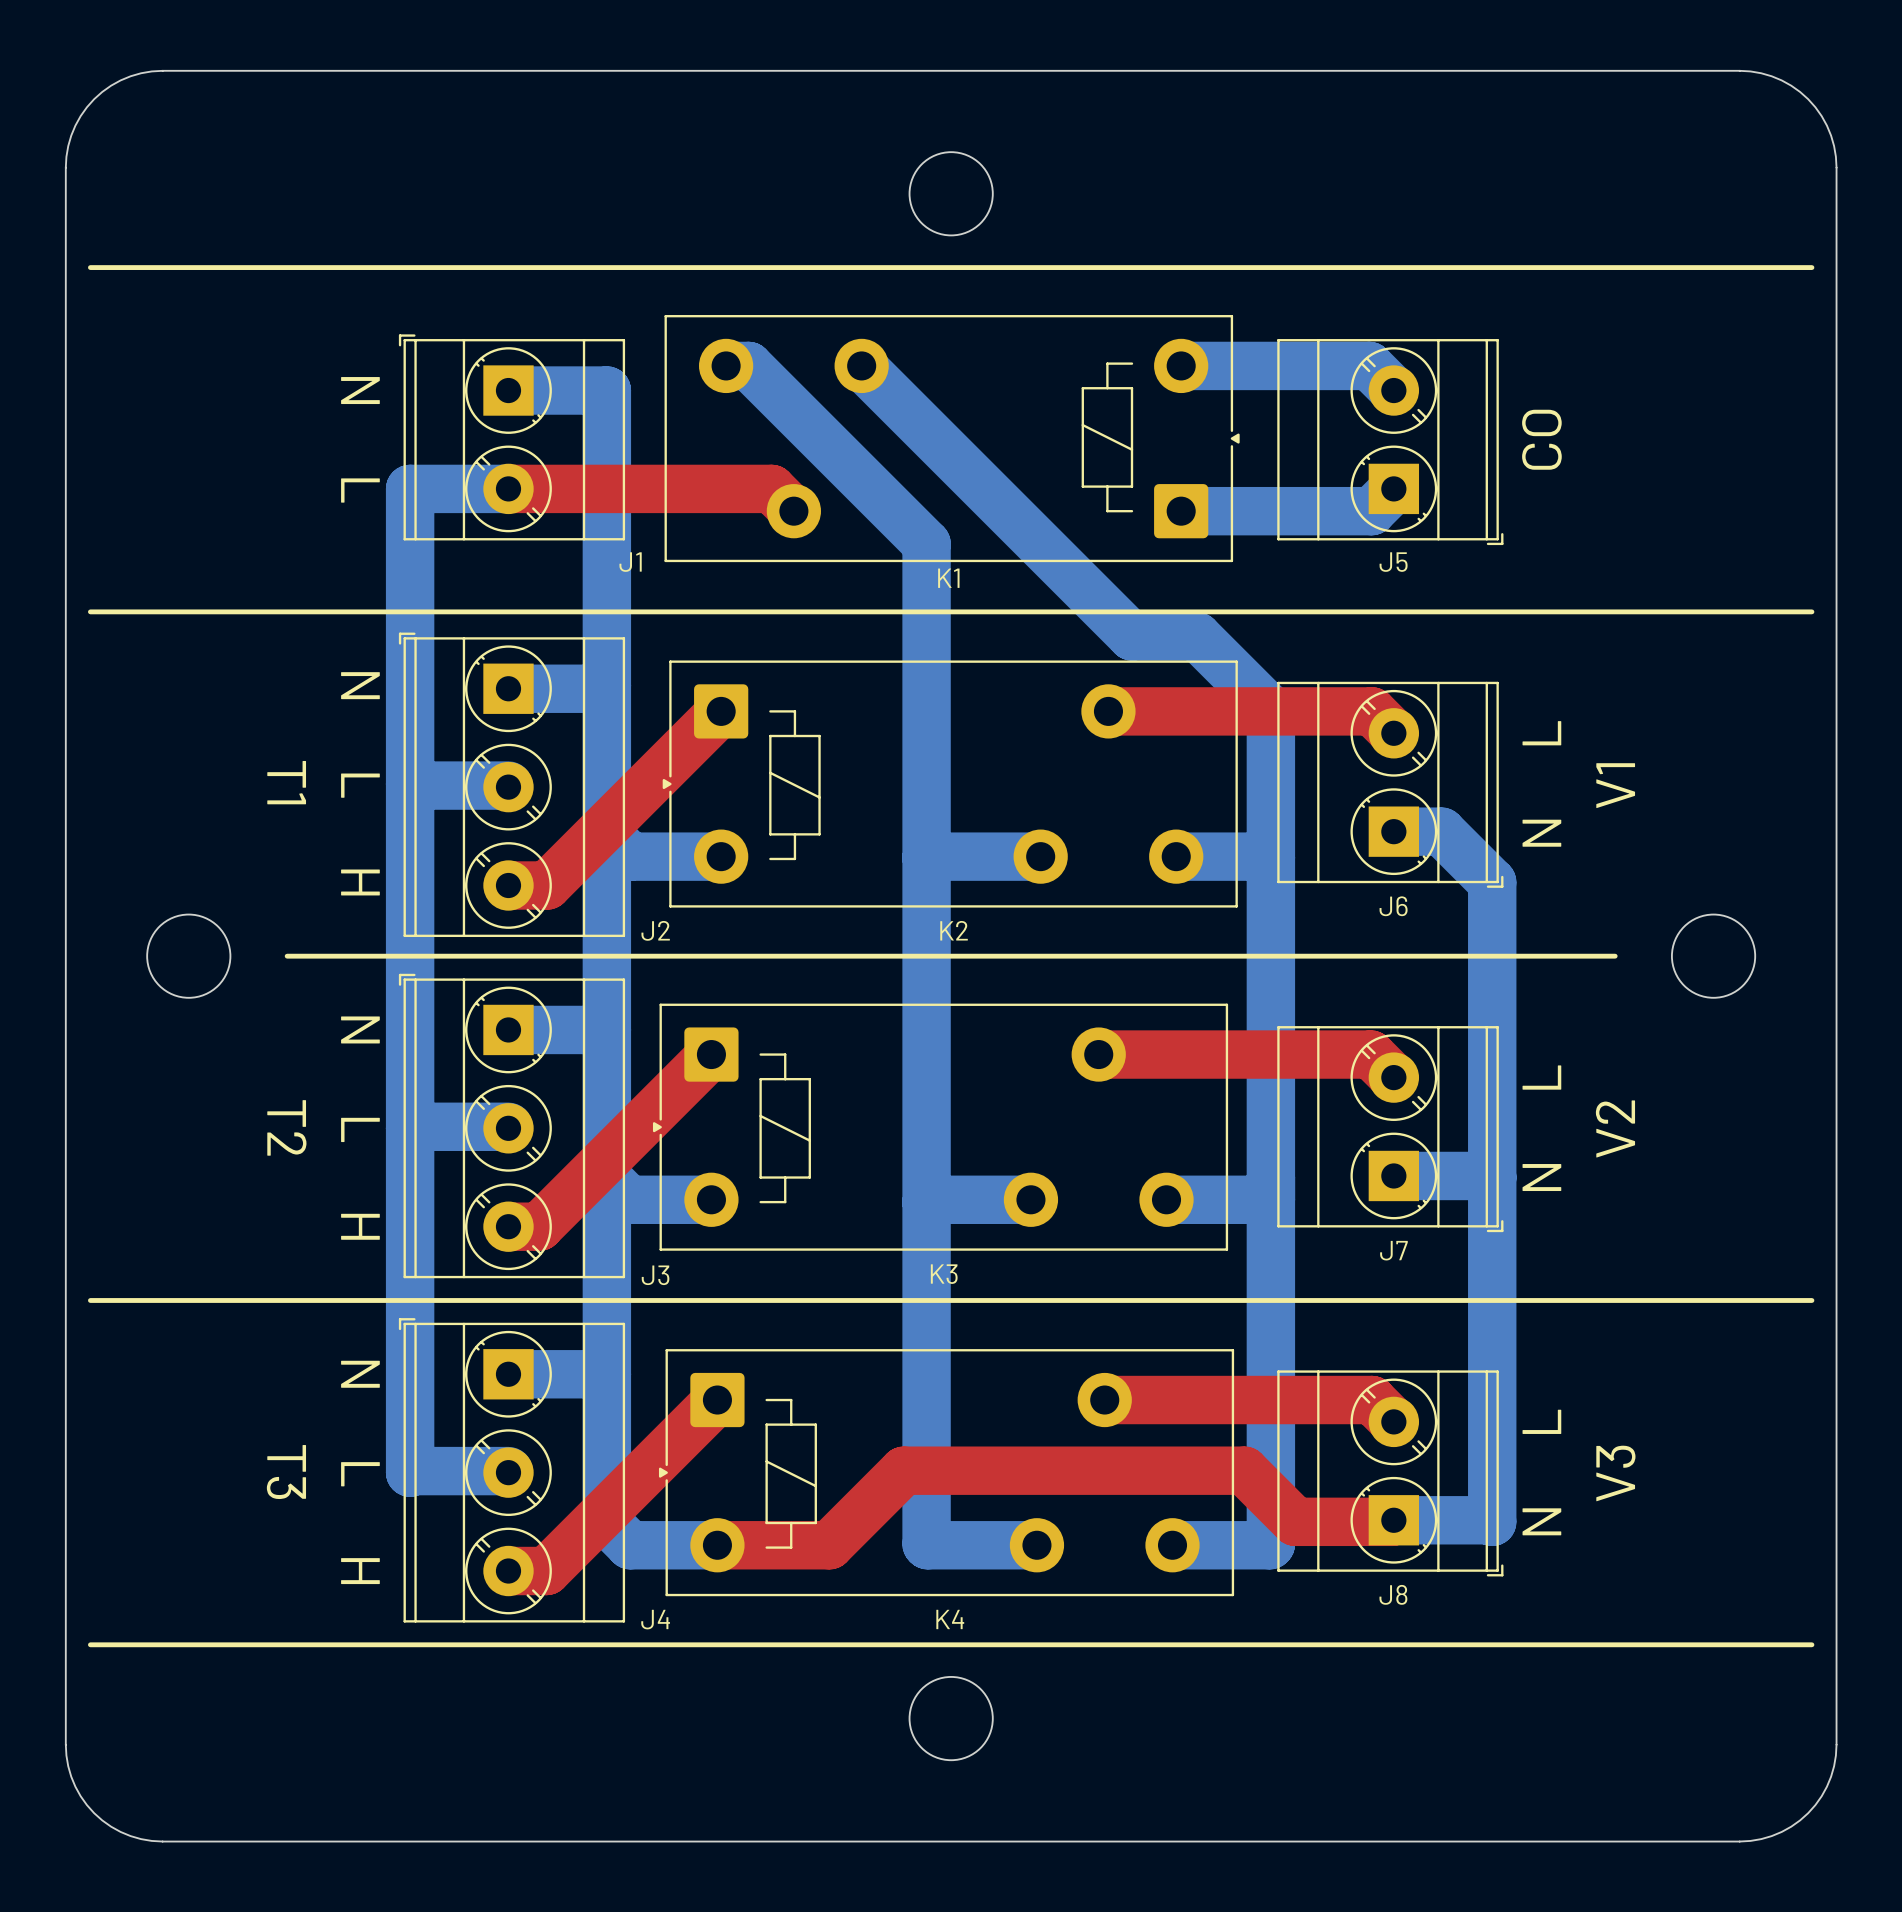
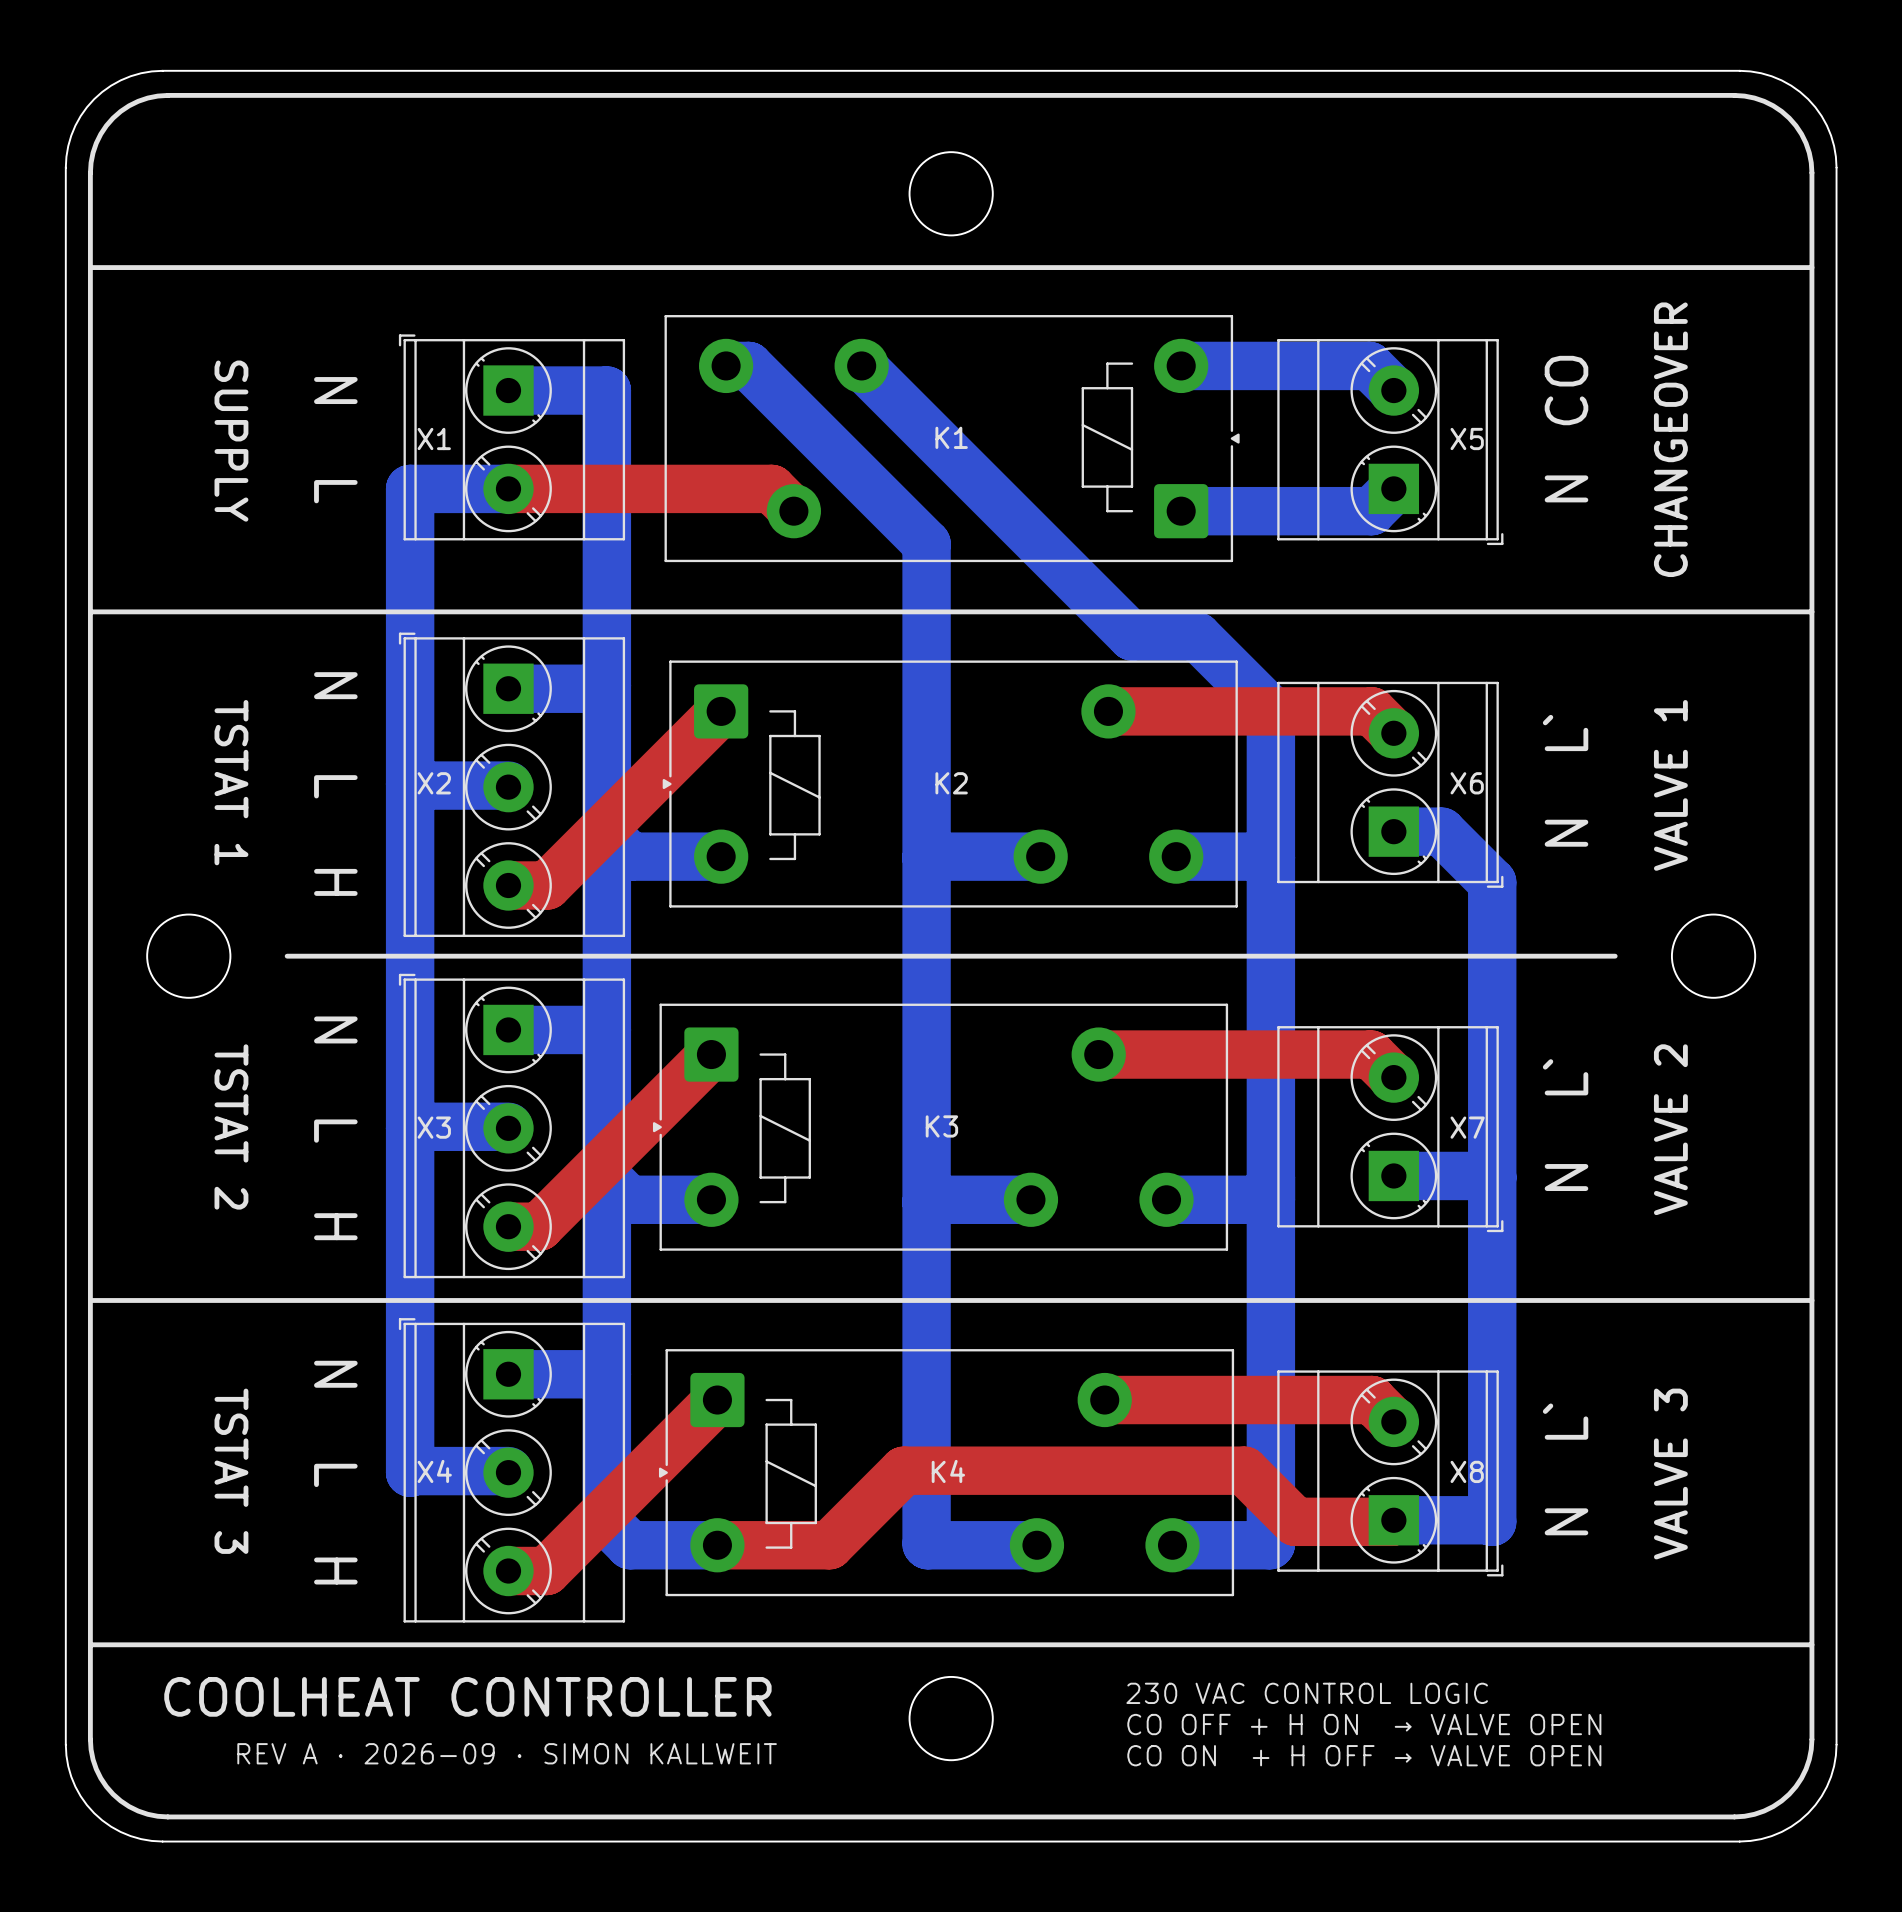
line: none -> (167, 95) (1734, 95) (1764, 101) (1789, 118) (1806, 143) (1811, 172) (1811, 1739) (1806, 1769) (1789, 1794) (1764, 1811) (1734, 1816) (167, 1816) (138, 1811) (113, 1794) (96, 1769) (90, 1739) (90, 172) (96, 143) (113, 118) (138, 101) (167, 95)
text position: N (360, 390) -> N (335, 390)
text position: CO (1541, 439) -> CO (1566, 390)
text: none -> CHANGEOVER (1670, 439)
text: none -> SUPPLY (231, 441)
text: none -> N (1566, 488)
text position: L (360, 490) -> L (335, 491)
J1 name: J1 (630, 562) -> X1 (434, 438)
J5 name: J5 (1393, 562) -> X5 (1467, 438)
K1 name position: K1 (948, 578) -> K1 (951, 437)
text position: N (360, 685) -> N (335, 685)
text: L (1541, 733) -> L` (1565, 732)
text: none -> TSTAT 1 (231, 782)
text: T1 (286, 782) -> none
text position: L (360, 785) -> L (335, 786)
text: V1 (1615, 785) -> none
text: none -> VALVE 1 (1670, 785)
text position: N (1541, 833) -> N (1566, 833)
text position: H (360, 882) -> H (335, 882)
J6 name: J6 (1393, 906) -> X6 (1467, 783)
J2 name: J2 (655, 930) -> X2 (434, 783)
K2 name position: K2 (954, 930) -> K2 (951, 783)
text position: N (360, 1029) -> N (335, 1029)
text: L (1541, 1077) -> L` (1565, 1077)
text: T2 (286, 1127) -> none
text: none -> TSTAT 2 (231, 1126)
text: V2 (1615, 1128) -> none
text: none -> VALVE 2 (1670, 1129)
text position: L (360, 1129) -> L (335, 1131)
text position: N (1541, 1177) -> N (1566, 1177)
text position: H (360, 1226) -> H (335, 1226)
J7 name: J7 (1393, 1250) -> X7 (1467, 1127)
K3 name position: K3 (944, 1274) -> K3 (941, 1126)
J3 name: J3 (655, 1275) -> X3 (434, 1127)
text position: N (360, 1374) -> N (335, 1374)
text: L (1541, 1421) -> L` (1565, 1421)
text: none -> TSTAT 3 (231, 1471)
text: T3 (286, 1472) -> none
text: V3 (1615, 1473) -> none
text: none -> VALVE 3 (1670, 1474)
text position: L (360, 1474) -> L (335, 1475)
text position: N (1541, 1521) -> N (1566, 1521)
text position: H (360, 1571) -> H (335, 1571)
J8 name: J8 (1393, 1594) -> X8 (1467, 1471)
J4 name: J4 (655, 1619) -> X4 (434, 1471)
K4 name position: K4 (950, 1619) -> K4 (948, 1471)
text: none -> 230 VAC CONTROL LOGIC (1307, 1693)
text: none -> COOLHEAT CONTROLLER (467, 1696)
text: none -> CO OFF + H ON → VALVE OPEN (1364, 1724)
text: none -> REV A · 2026-09 · SIMON KALLWEIT (507, 1753)
text: none -> CO ON + H OFF → VALVE OPEN (1364, 1755)

